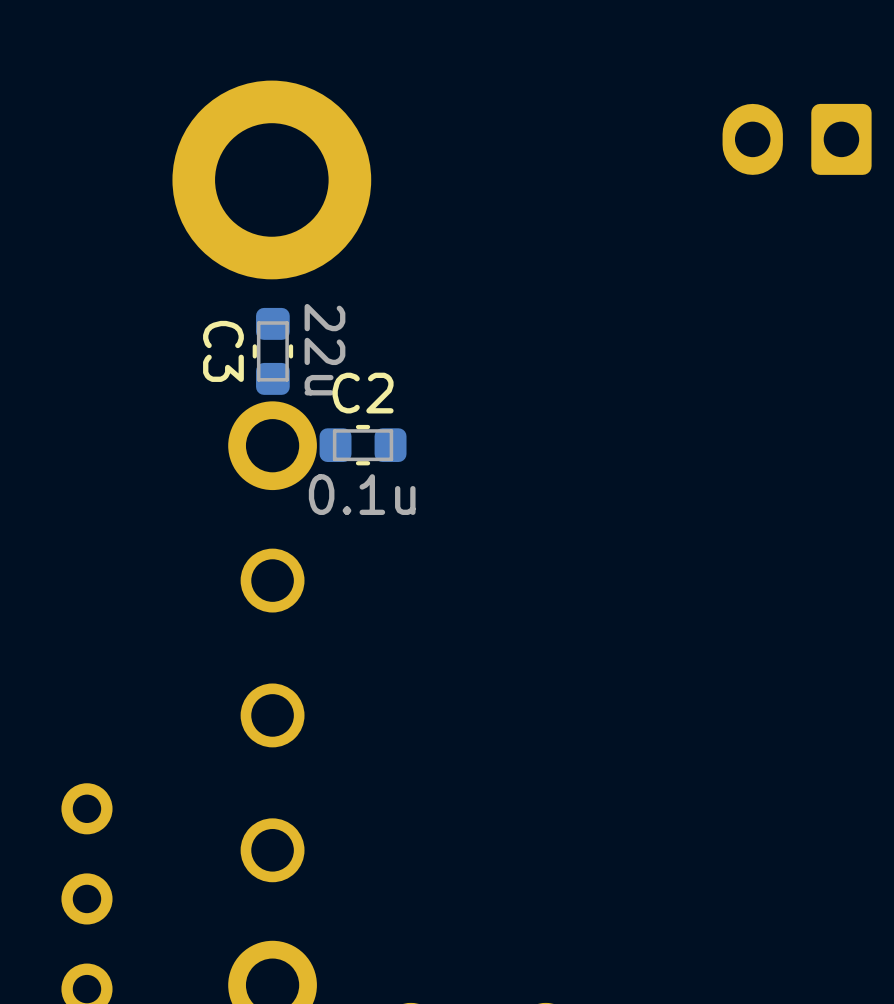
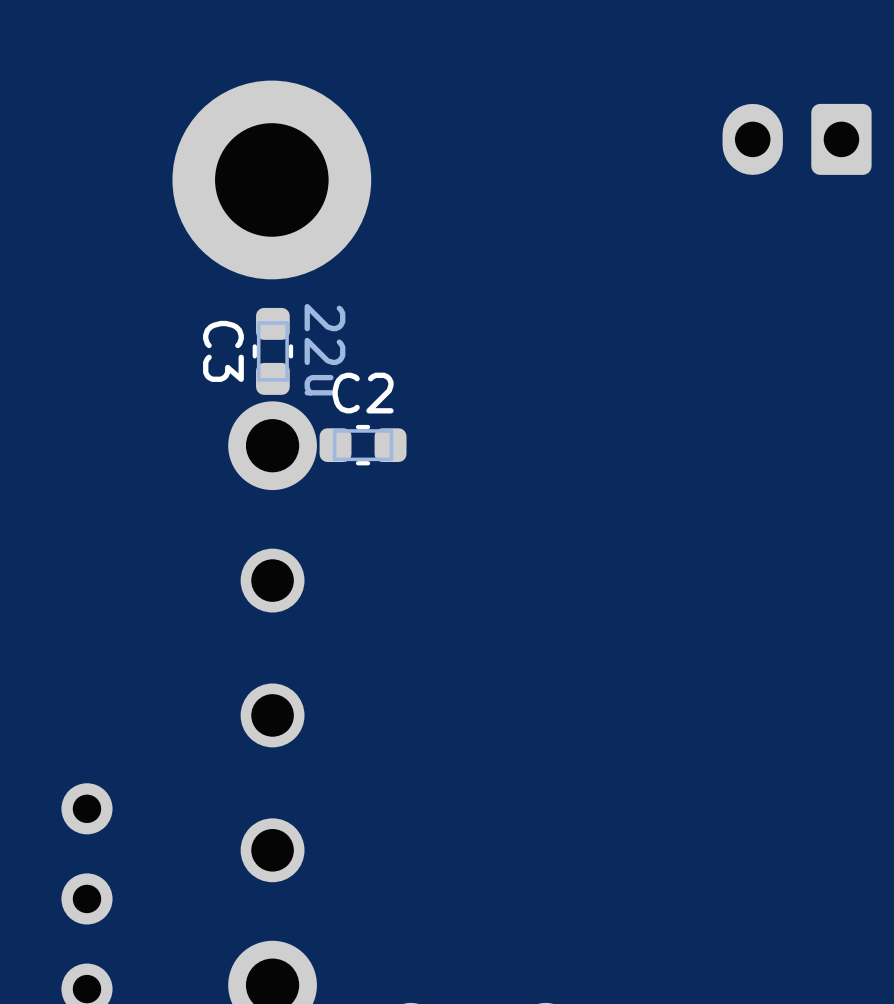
C2 value: 0.1u (362, 494) -> none

